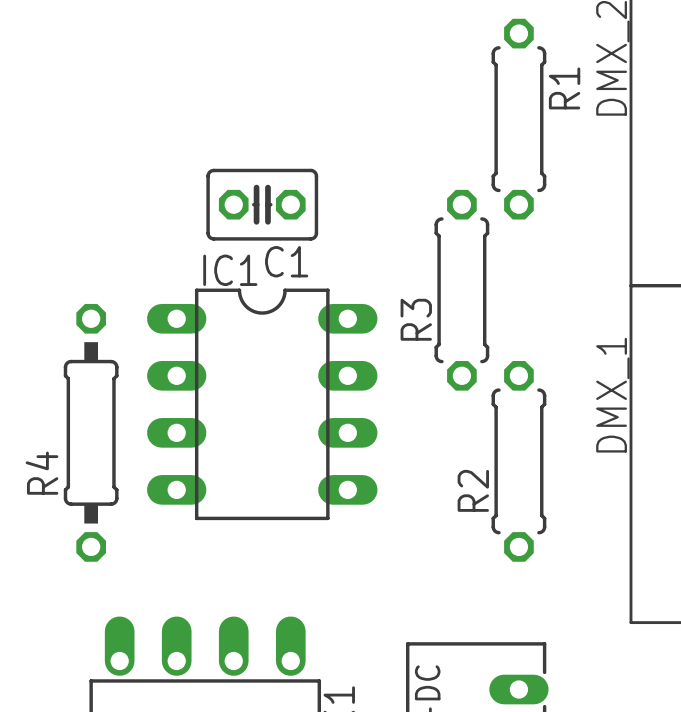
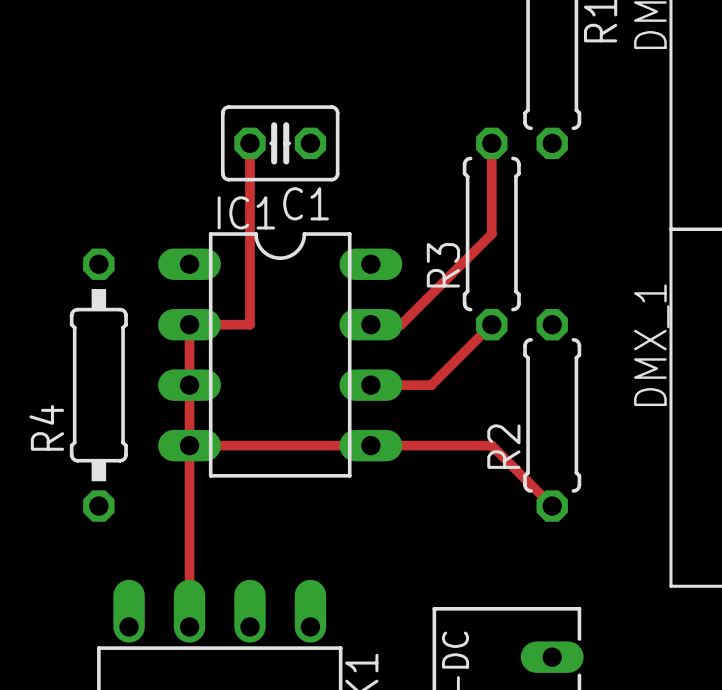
track: none -> (249, 143) (249, 324) (189, 324) (189, 626)
track: none -> (491, 143) (491, 234) (401, 324) (370, 324)
track: none -> (491, 324) (431, 385) (370, 385)
track: none -> (189, 445) (491, 445) (552, 506)

